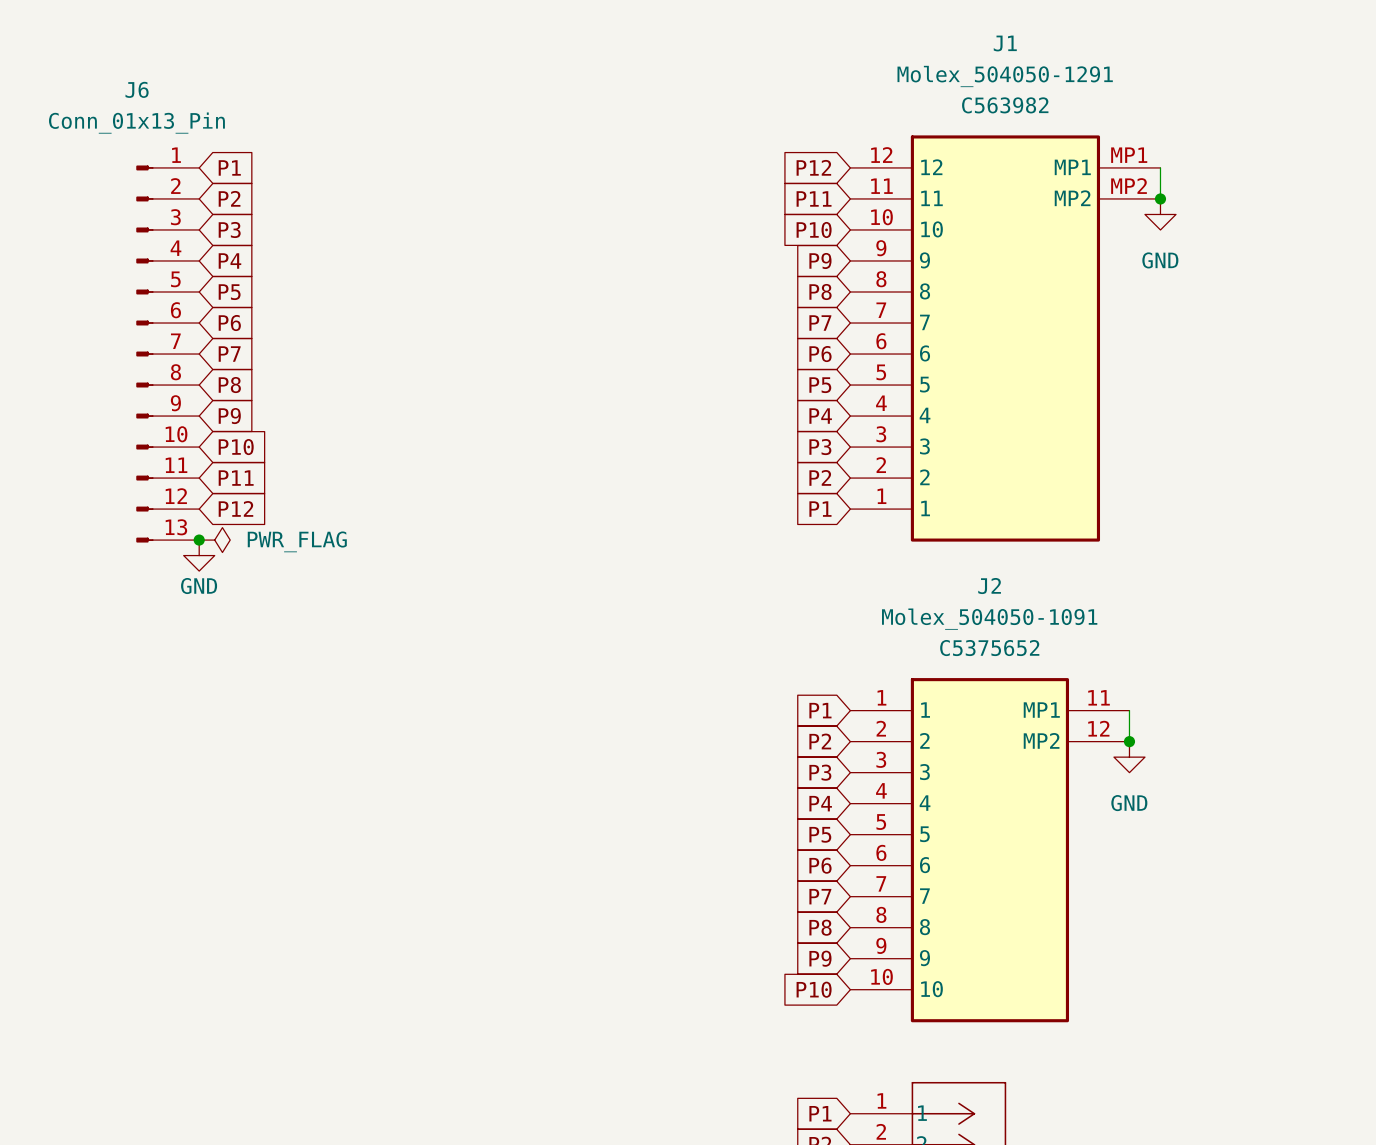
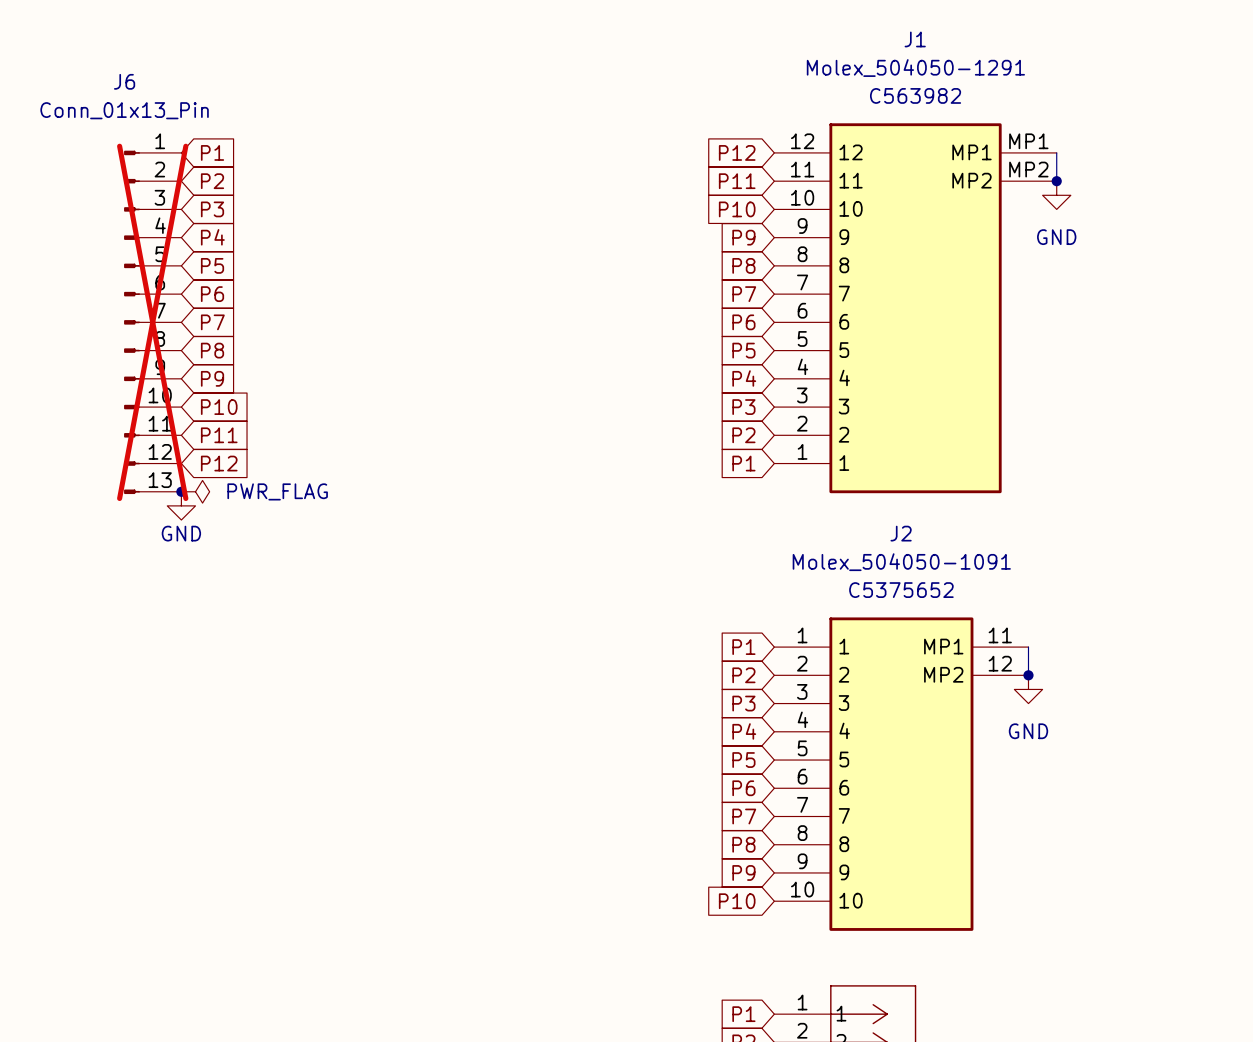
J6 do-not-place cross: none -> (152, 322)

